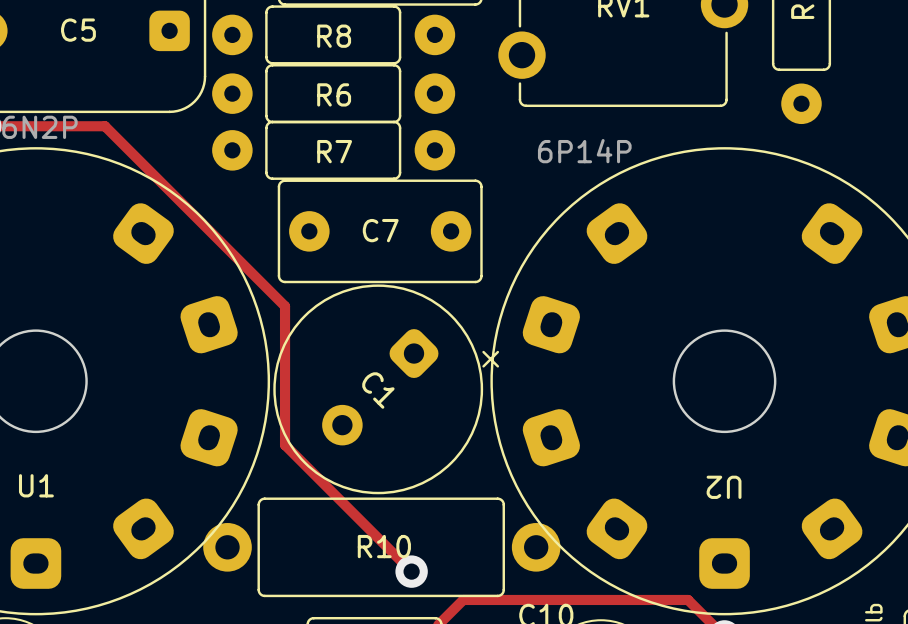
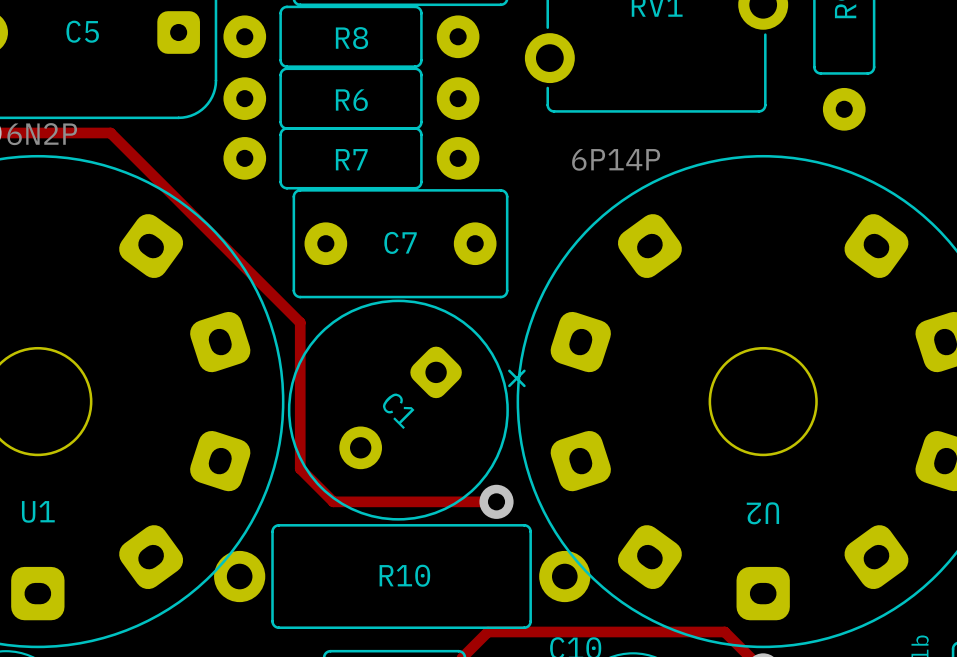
track: (316, 476) (411, 571) -> (333, 501) (496, 501)
via: none -> (496, 501)
via: (411, 571) -> none

